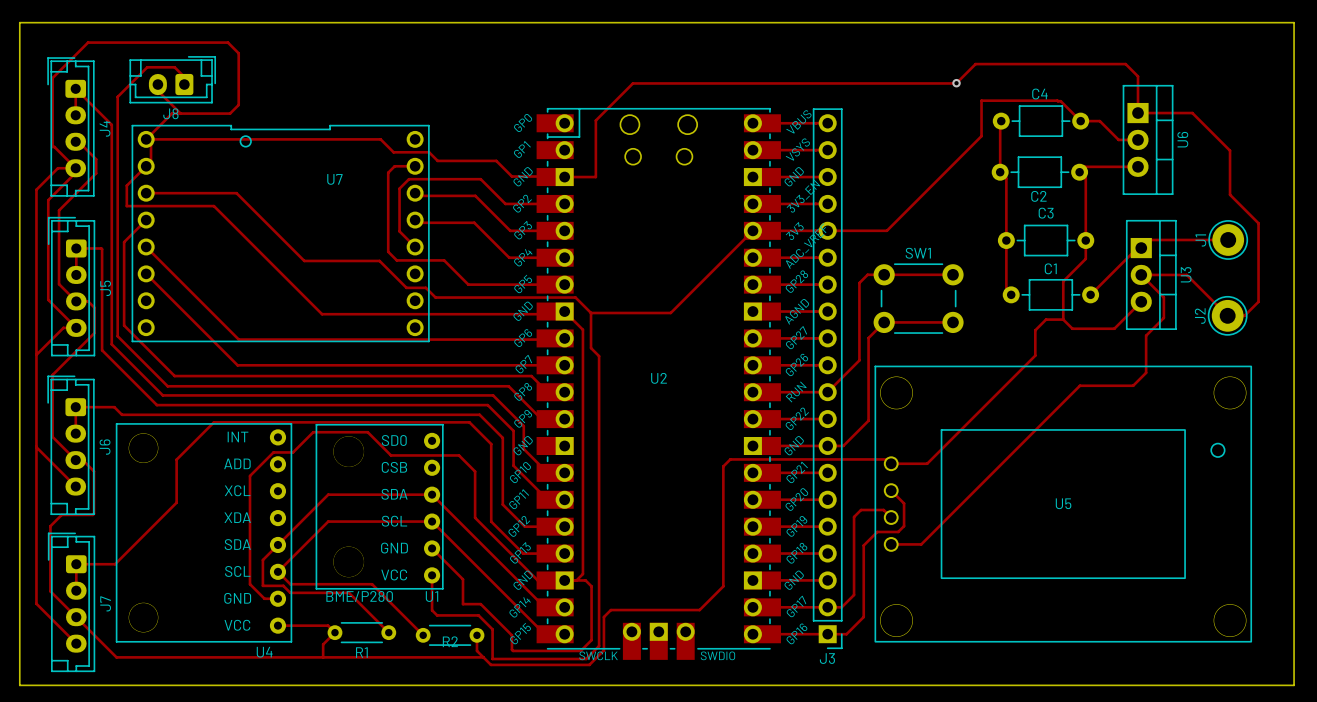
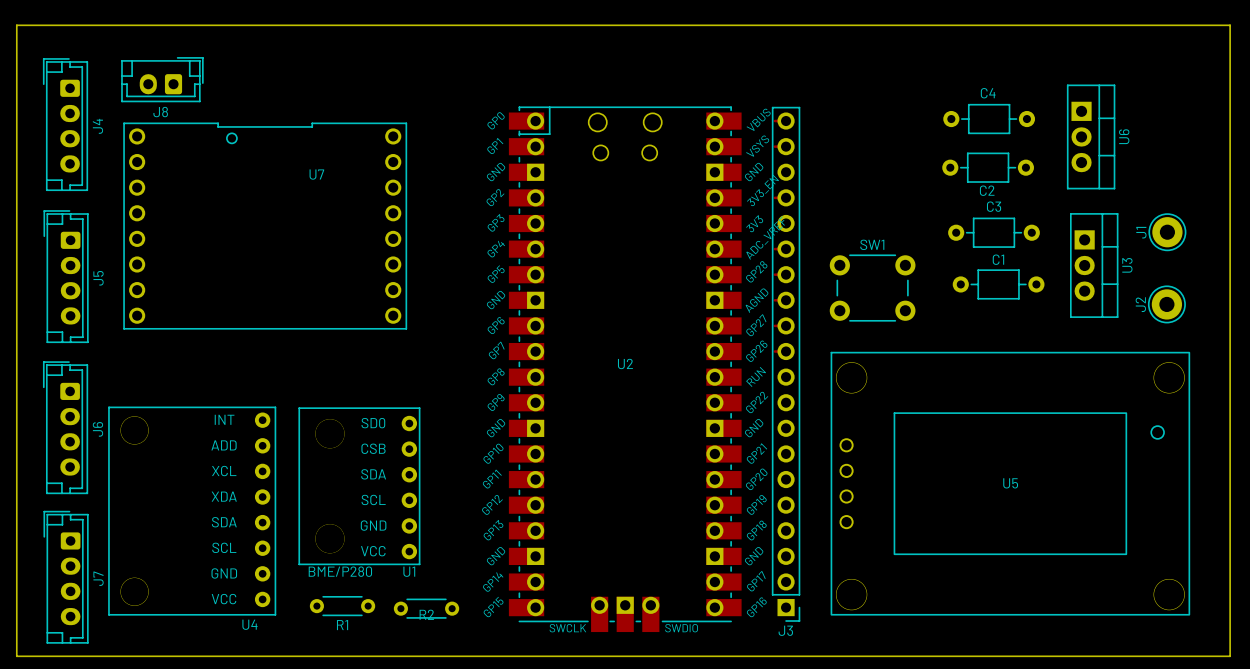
via: (956, 83) -> none
track: (157, 84) (157, 90) (180, 113) -> none
track: (184, 84) (184, 77) (174, 67) (147, 67) (117, 96) (117, 336) (167, 386) (508, 386) (541, 419) (564, 419) -> none
track: (75, 115) (75, 88) (111, 124) (111, 344) (162, 395) (493, 395) (523, 426) (523, 449) (547, 472) (564, 472) -> none
track: (1001, 121) (1000, 172) (1006, 178) (1006, 290) (1011, 294) -> none
track: (752, 123) (815, 123) -> none
track: (1138, 139) (1118, 139) (1099, 121) (1080, 121) (1060, 101) (981, 100) (981, 136) (886, 230) (815, 230) -> none
track: (75, 141) (78, 141) (96, 159) (96, 173) (59, 210) (59, 284) (76, 301) (88, 301) (94, 307) (94, 333) (52, 374) (52, 436) (75, 460) (82, 460) (94, 471) (94, 513) (61, 514) (50, 526) (50, 591) (116, 657) (483, 657) -> none
track: (151, 142) (151, 168) -> none
track: (752, 150) (815, 150) -> none
track: (146, 166) (126, 185) (126, 206) (213, 206) (322, 314) (561, 314) (564, 311) (582, 329) (582, 574) (576, 580) -> none
track: (415, 166) (394, 166) (388, 172) (388, 251) (396, 260) (444, 260) (468, 284) (564, 284) -> none
track: (1138, 166) (1084, 166) (1079, 172) (1085, 178) (1085, 258) (1063, 281) (1063, 319) -> none
track: (75, 168) (57, 168) (36, 189) (36, 603) (76, 643) -> none
track: (75, 168) (52, 146) (52, 78) (88, 42) (227, 42) (238, 53) (238, 104) (230, 113) (172, 113) (146, 139) (380, 139) (393, 152) (429, 152) (437, 160) (496, 160) (511, 176) (595, 177) (595, 120) (632, 83) (956, 83) (975, 64) (1125, 64) (1138, 76) (1138, 113) (1192, 113) (1230, 150) (1230, 194) (1258, 223) (1258, 301) (1244, 315) (1227, 315) (1186, 274) (1141, 274) (1163, 297) (1163, 317) (1146, 335) (1146, 372) (1133, 385) (1079, 385) (921, 544) (891, 544) -> none
track: (75, 168) (75, 172) (48, 200) (48, 299) (76, 327) (63, 327) (36, 354) -> none
track: (752, 177) (827, 177) -> none
track: (146, 193) (236, 193) (304, 260) (379, 260) (406, 287) (425, 287) (435, 297) (575, 297) (591, 313) -> none
track: (419, 195) (475, 195) (510, 230) (564, 230) -> none
track: (564, 203) (505, 203) (480, 179) (408, 179) (399, 188) (399, 231) (415, 246) -> none
track: (752, 203) (815, 203) -> none
track: (146, 220) (124, 242) (124, 325) (174, 376) (531, 376) (547, 392) (564, 392) -> none
track: (419, 222) (474, 222) (509, 257) (564, 257) -> none
track: (815, 230) (752, 230) (670, 313) (591, 313) -> none
track: (1228, 239) (1149, 239) (1141, 248) (1137, 248) (1090, 294) -> none
track: (146, 246) (238, 339) (564, 338) -> none
track: (752, 257) (815, 257) -> none
track: (146, 273) (237, 365) (564, 365) -> none
track: (76, 274) (76, 248) (101, 248) (102, 350) (156, 405) (487, 405) (513, 430) (513, 465) (547, 499) (564, 499) -> none
track: (953, 274) (867, 274) (859, 283) (859, 360) (827, 392) (752, 392) -> none
track: (752, 284) (815, 284) -> none
track: (1141, 301) (1114, 328) (1072, 328) (1063, 319) -> none
track: (752, 311) (815, 311) -> none
track: (591, 313) (591, 348) (599, 356) (599, 646) (586, 659) (492, 659) (492, 629) (478, 615) (437, 615) (432, 610) (432, 575) -> none
track: (1063, 319) (1046, 319) (1035, 330) (1035, 355) (927, 463) (891, 463) (886, 459) (730, 459) (723, 466) (723, 586) (699, 610) (610, 610) (603, 617) (603, 650) (589, 664) (490, 664) (476, 650) (476, 635) -> none
track: (953, 322) (884, 322) (868, 338) (868, 420) (843, 445) (752, 445) -> none
track: (752, 338) (815, 338) -> none
track: (752, 365) (815, 365) -> none
track: (752, 419) (827, 419) -> none
track: (75, 433) (75, 407) (114, 407) (121, 414) (479, 414) (502, 437) (502, 504) (524, 526) (564, 526) -> none
track: (36, 447) (75, 486) -> none
track: (752, 472) (827, 472) -> none
track: (891, 490) (904, 503) (904, 526) (898, 531) (877, 531) (863, 545) (863, 617) (846, 634) (752, 634) -> none
track: (752, 499) (827, 499) -> none
track: (891, 517) (883, 510) (861, 510) (854, 517) (854, 594) (841, 607) (752, 607) -> none
track: (752, 526) (827, 526) -> none
track: (432, 548) (463, 579) (463, 604) (480, 604) (511, 635) (513, 650) (580, 650) (591, 640) (591, 586) (585, 580) (537, 580) (475, 517) (475, 471) (459, 455) (391, 455) (367, 432) (313, 432) (293, 452) (273, 452) (250, 475) (250, 584) (264, 598) (277, 598) -> none
track: (564, 553) (523, 553) (491, 521) (491, 444) (469, 422) (213, 422) (176, 459) (176, 502) (115, 564) (76, 564) (76, 590) -> none
track: (752, 553) (827, 553) -> none
track: (752, 580) (827, 580) -> none
track: (564, 607) (544, 607) (432, 494) (328, 494) (262, 560) (262, 585) (283, 585) (290, 592) (348, 592) (388, 632) -> none
track: (277, 625) (327, 625) (334, 632) (323, 644) (323, 657) -> none
track: (564, 634) (544, 634) (432, 521) (328, 521) (277, 571) (290, 584) (372, 584) (423, 635) -> none

